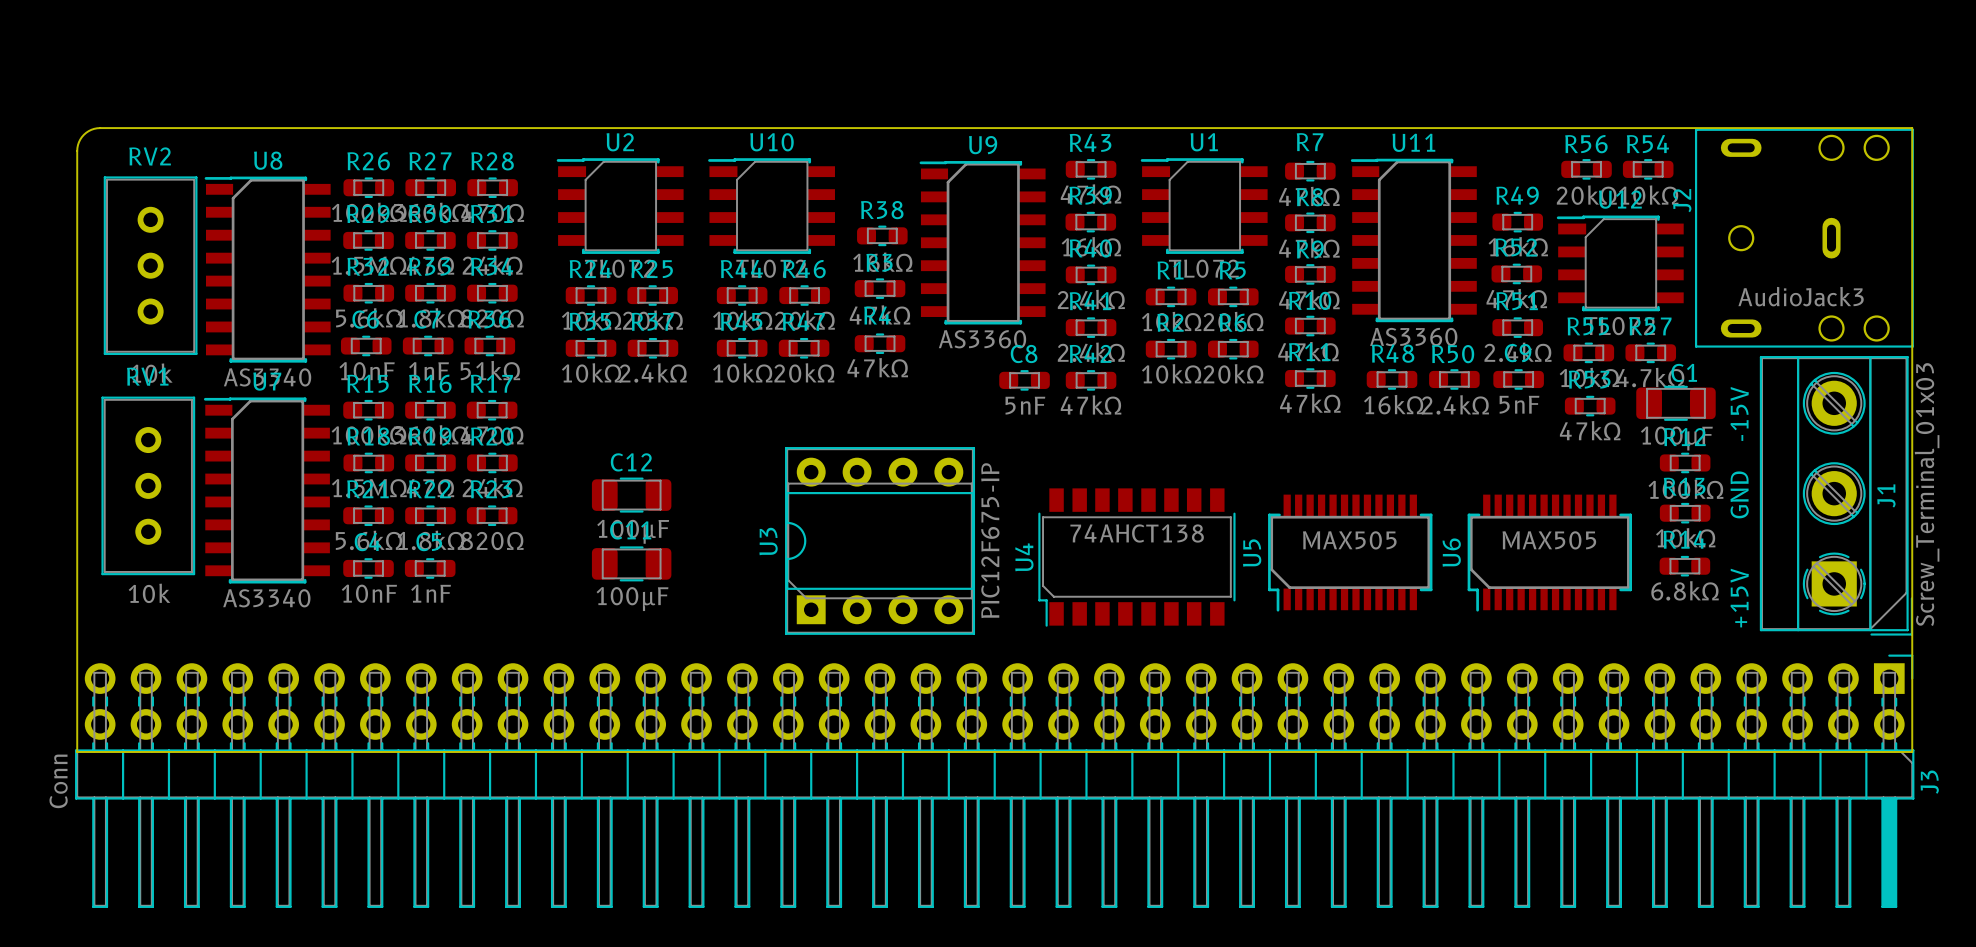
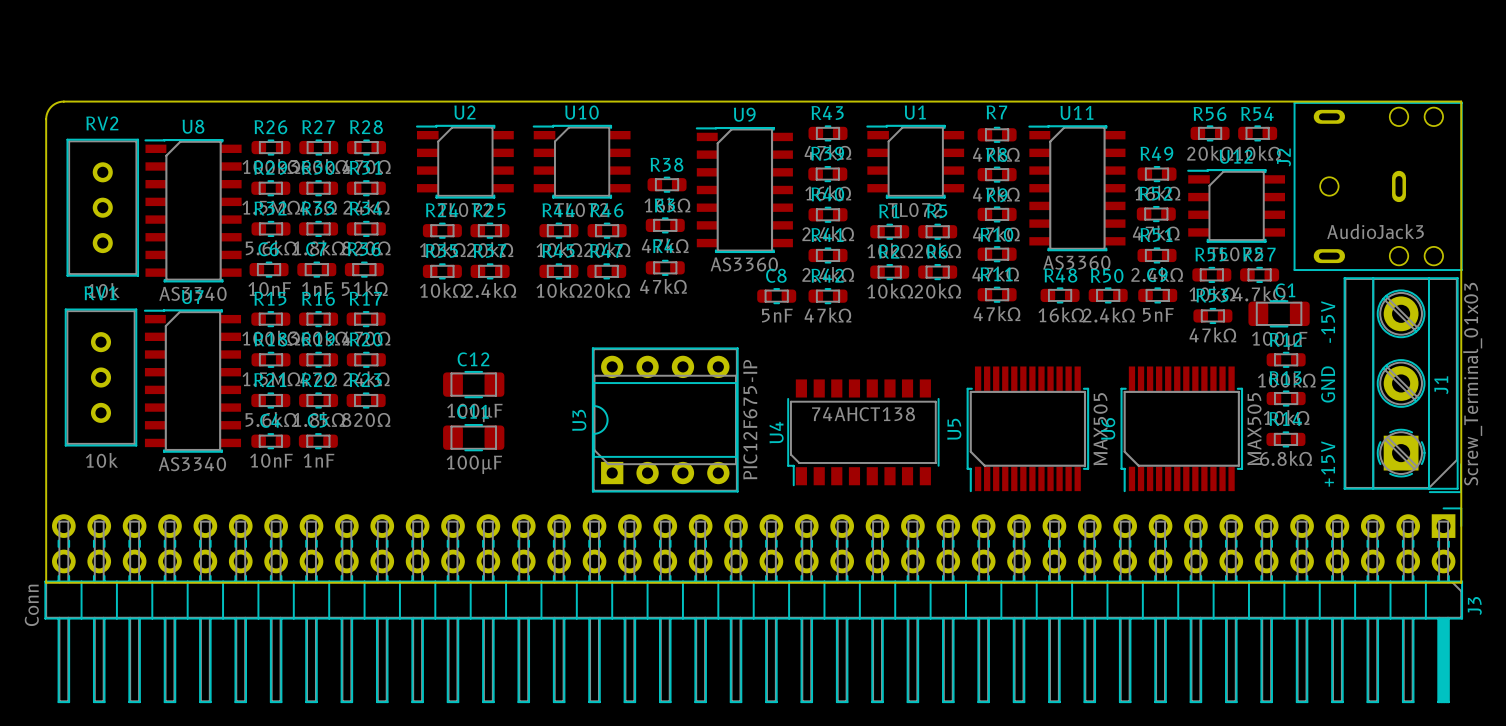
U5 footprint: [1268, 494, 1433, 612] -> [966, 366, 1090, 493]
U6 footprint: [1467, 494, 1633, 612] -> [1120, 366, 1244, 493]
U5 value position: MAX505 (1349, 540) -> MAX505 (1100, 429)
U6 value position: MAX505 (1549, 540) -> MAX505 (1254, 429)

